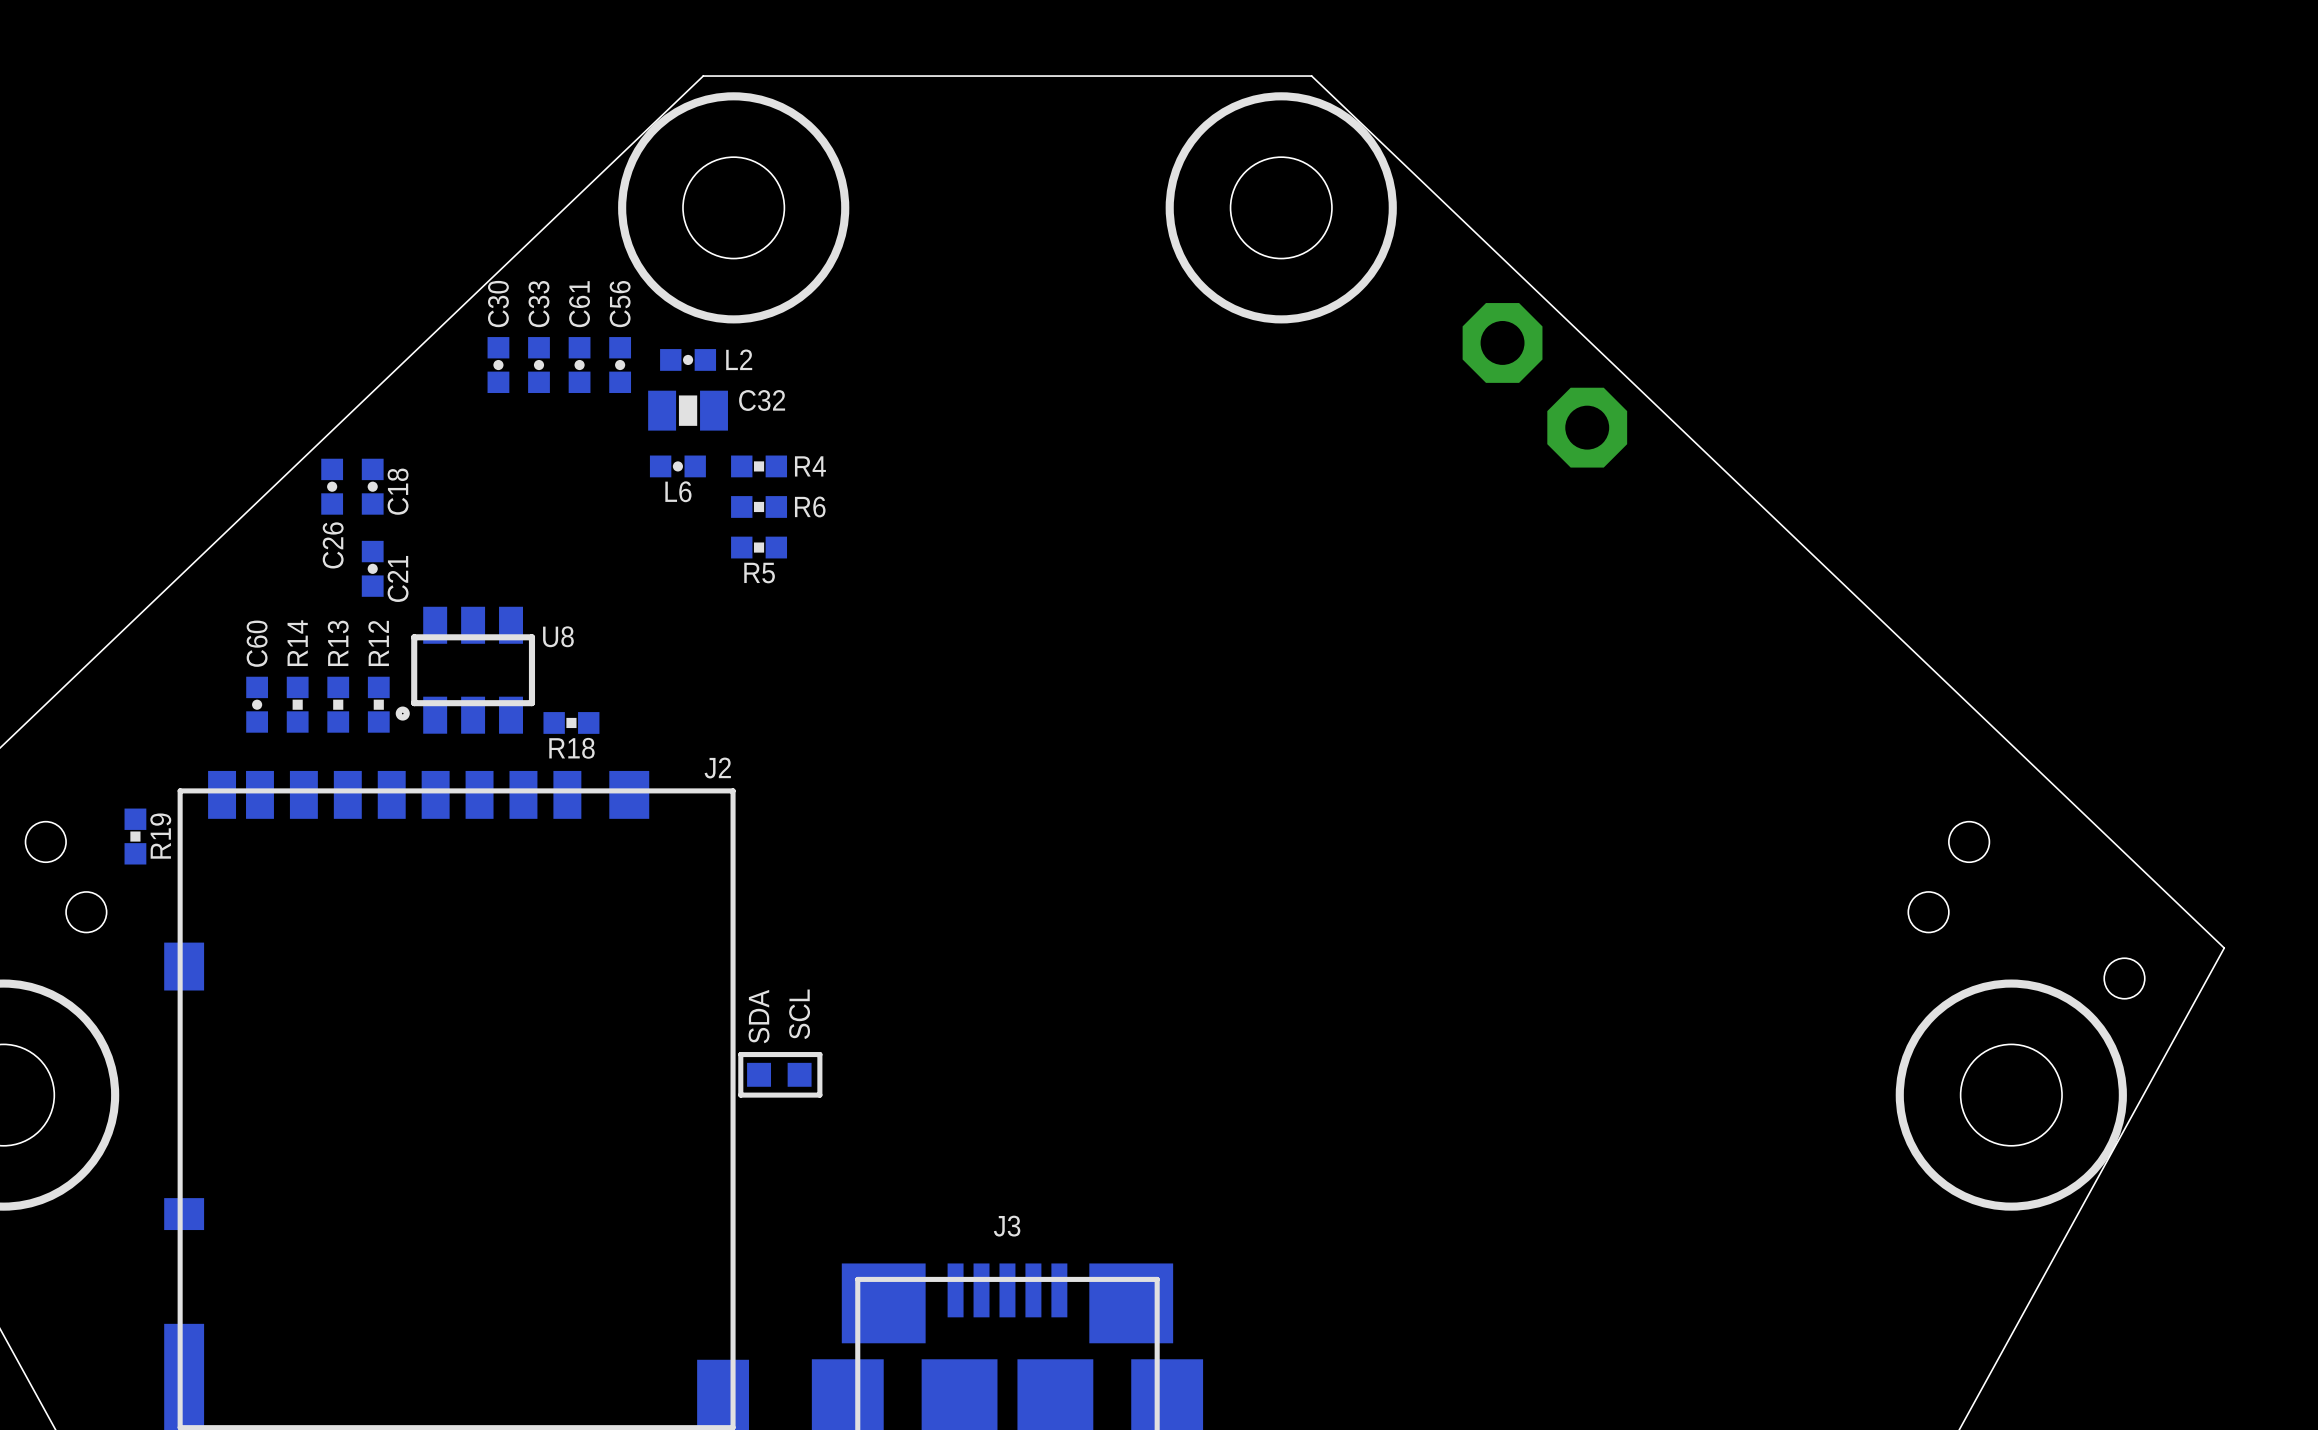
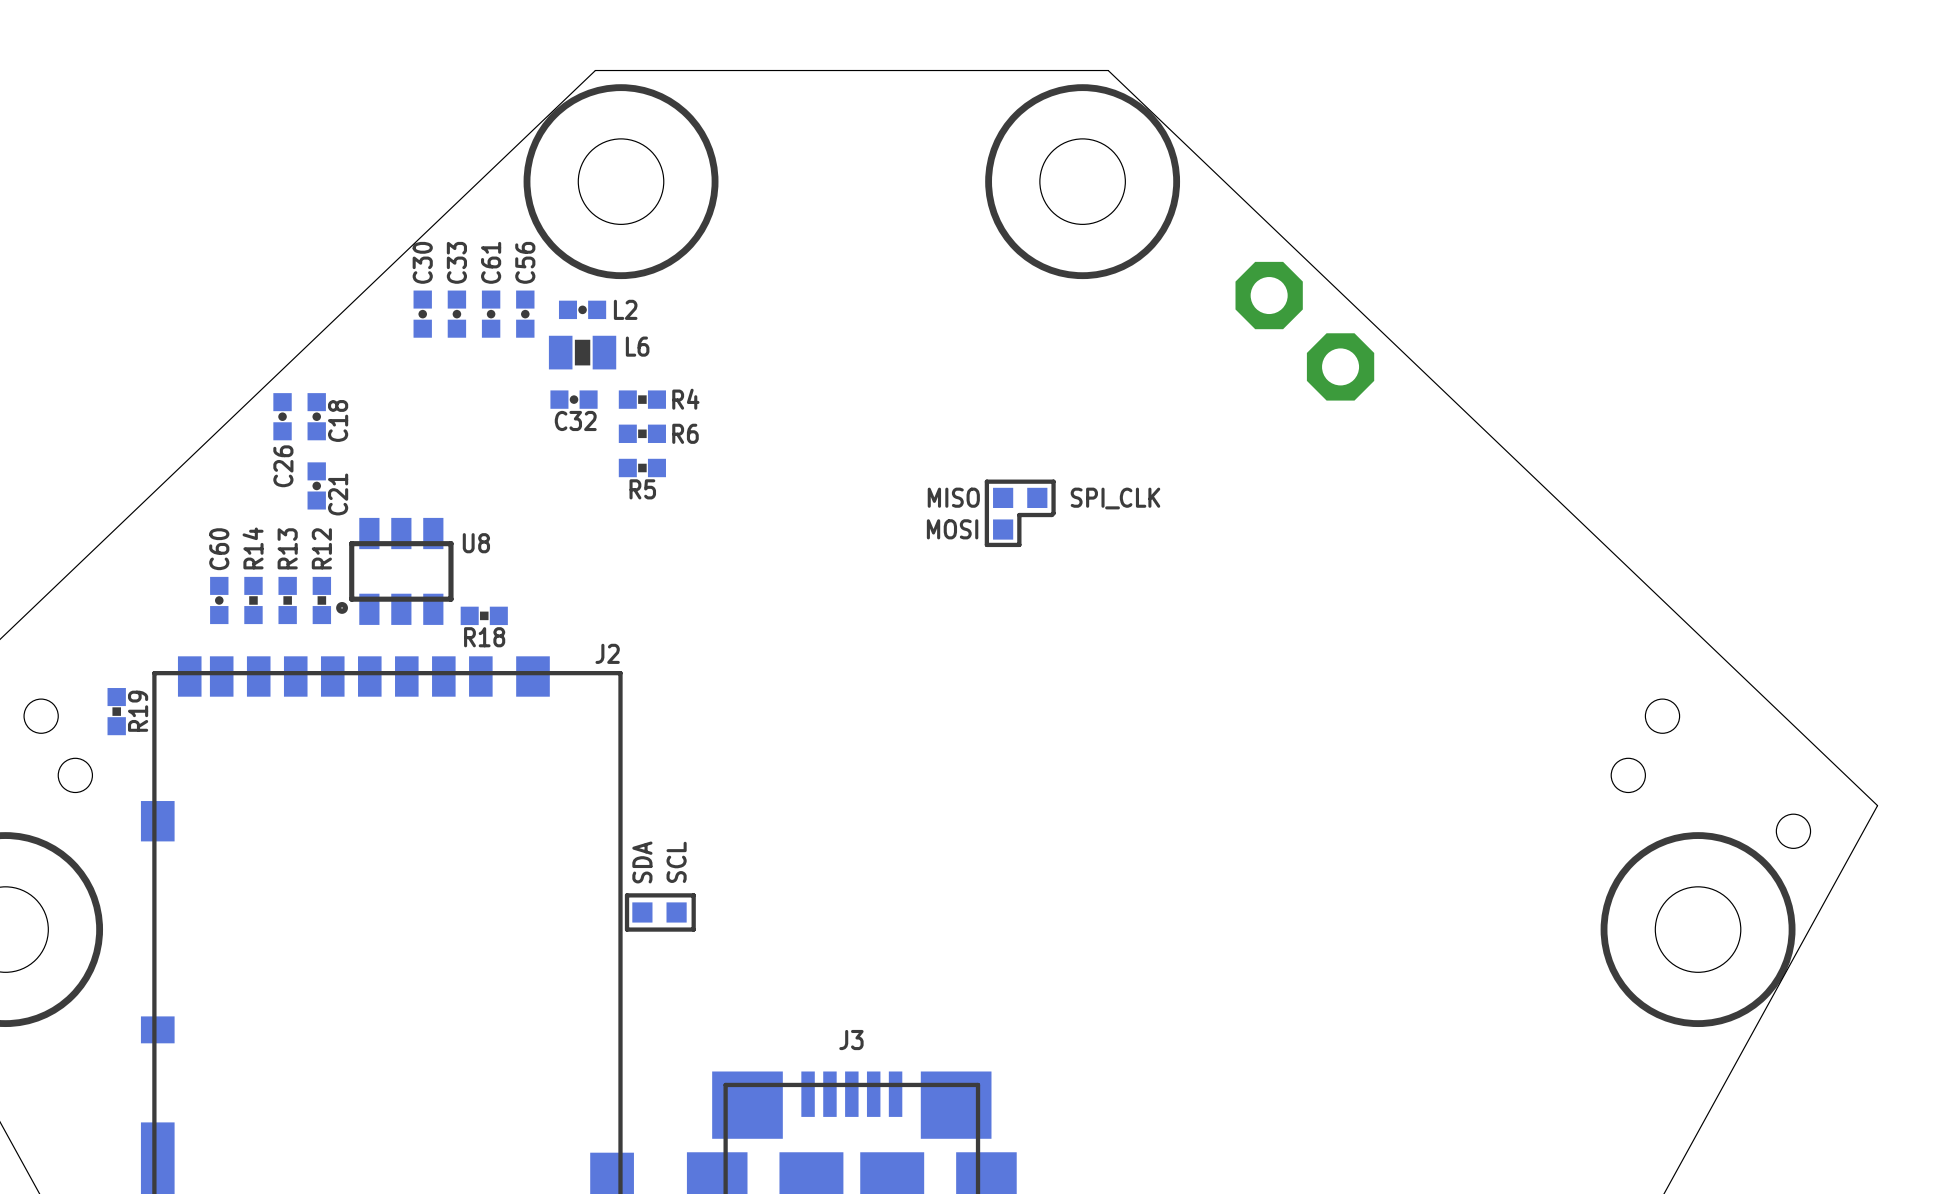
C32 name position: C32 (762, 400) -> C32 (575, 420)
L6 name position: L6 (678, 491) -> L6 (637, 346)
line: none -> (1053, 481) (986, 481) (986, 544) (1019, 544) (1019, 515) (1051, 515) (1053, 513) (1053, 481)
MISO: none -> (1003, 497)
SPI_CLK: none -> (1037, 497)
MOSI: none -> (1003, 529)

